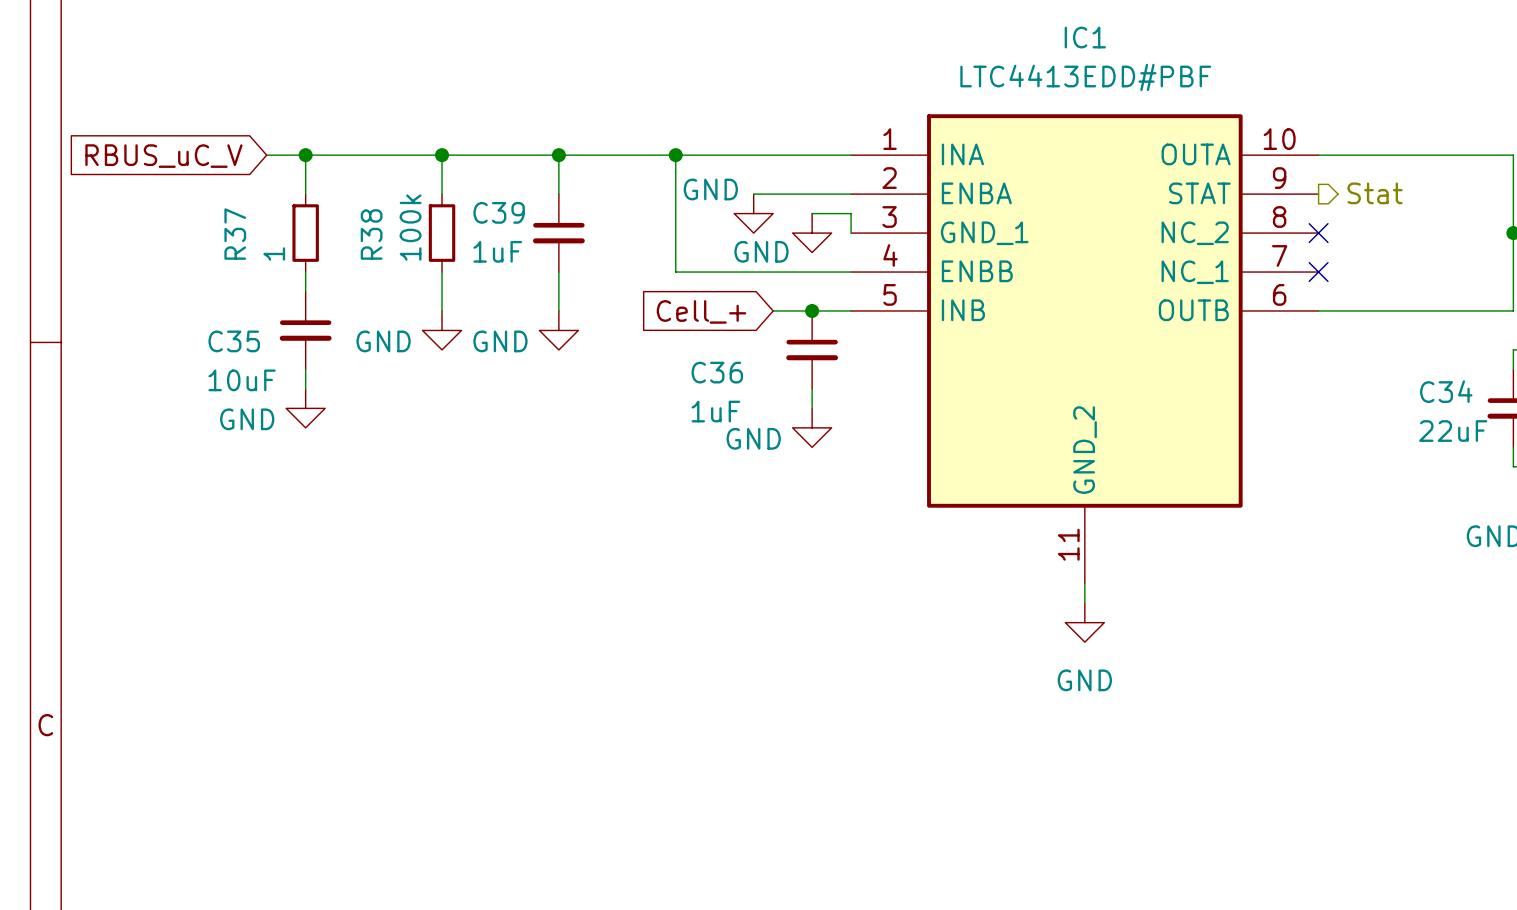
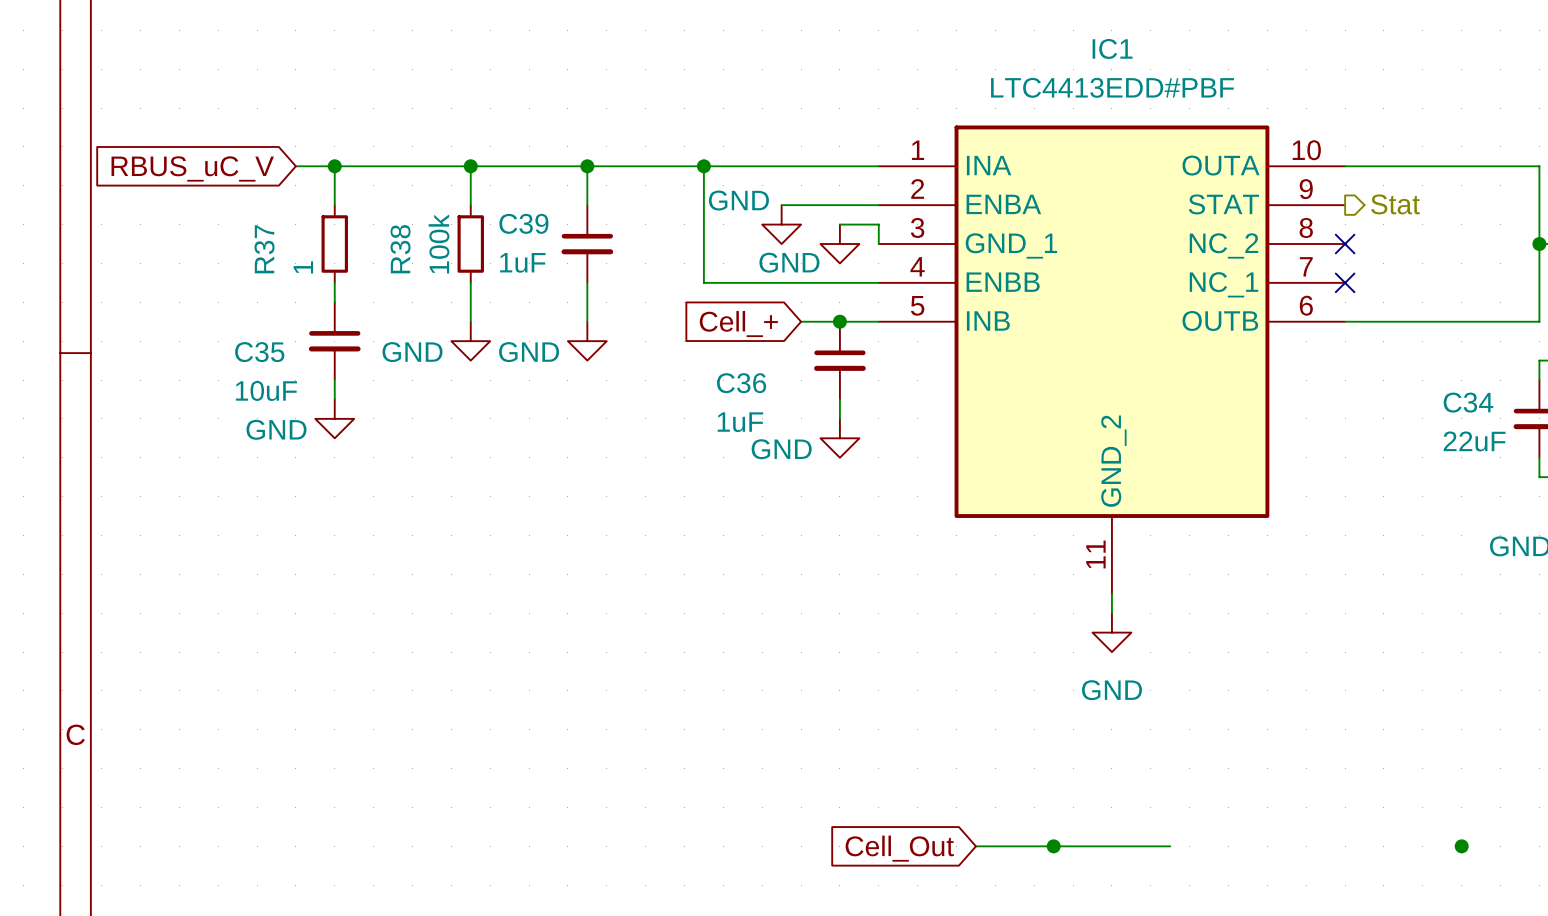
wire: none -> (975, 846) (1170, 846)
junction: none -> (1053, 846)
junction: none -> (1461, 846)
global label: none -> Cell_Out (899, 848)

